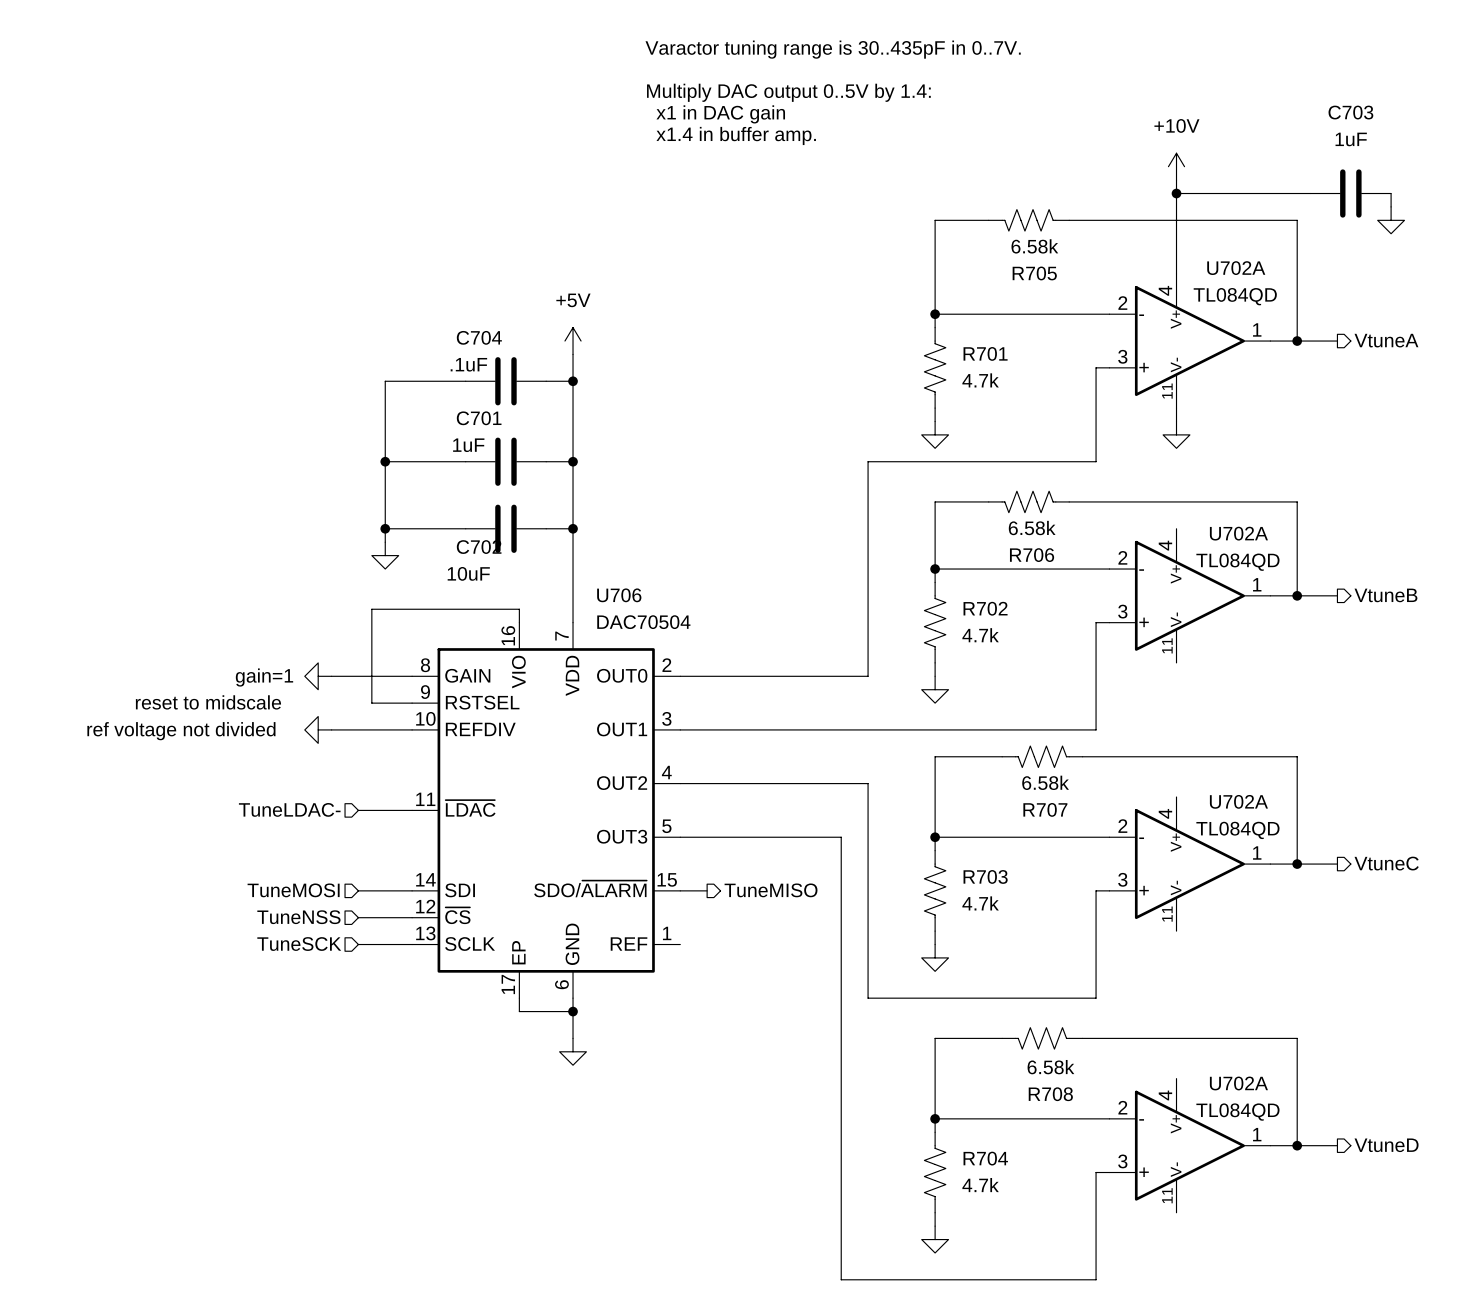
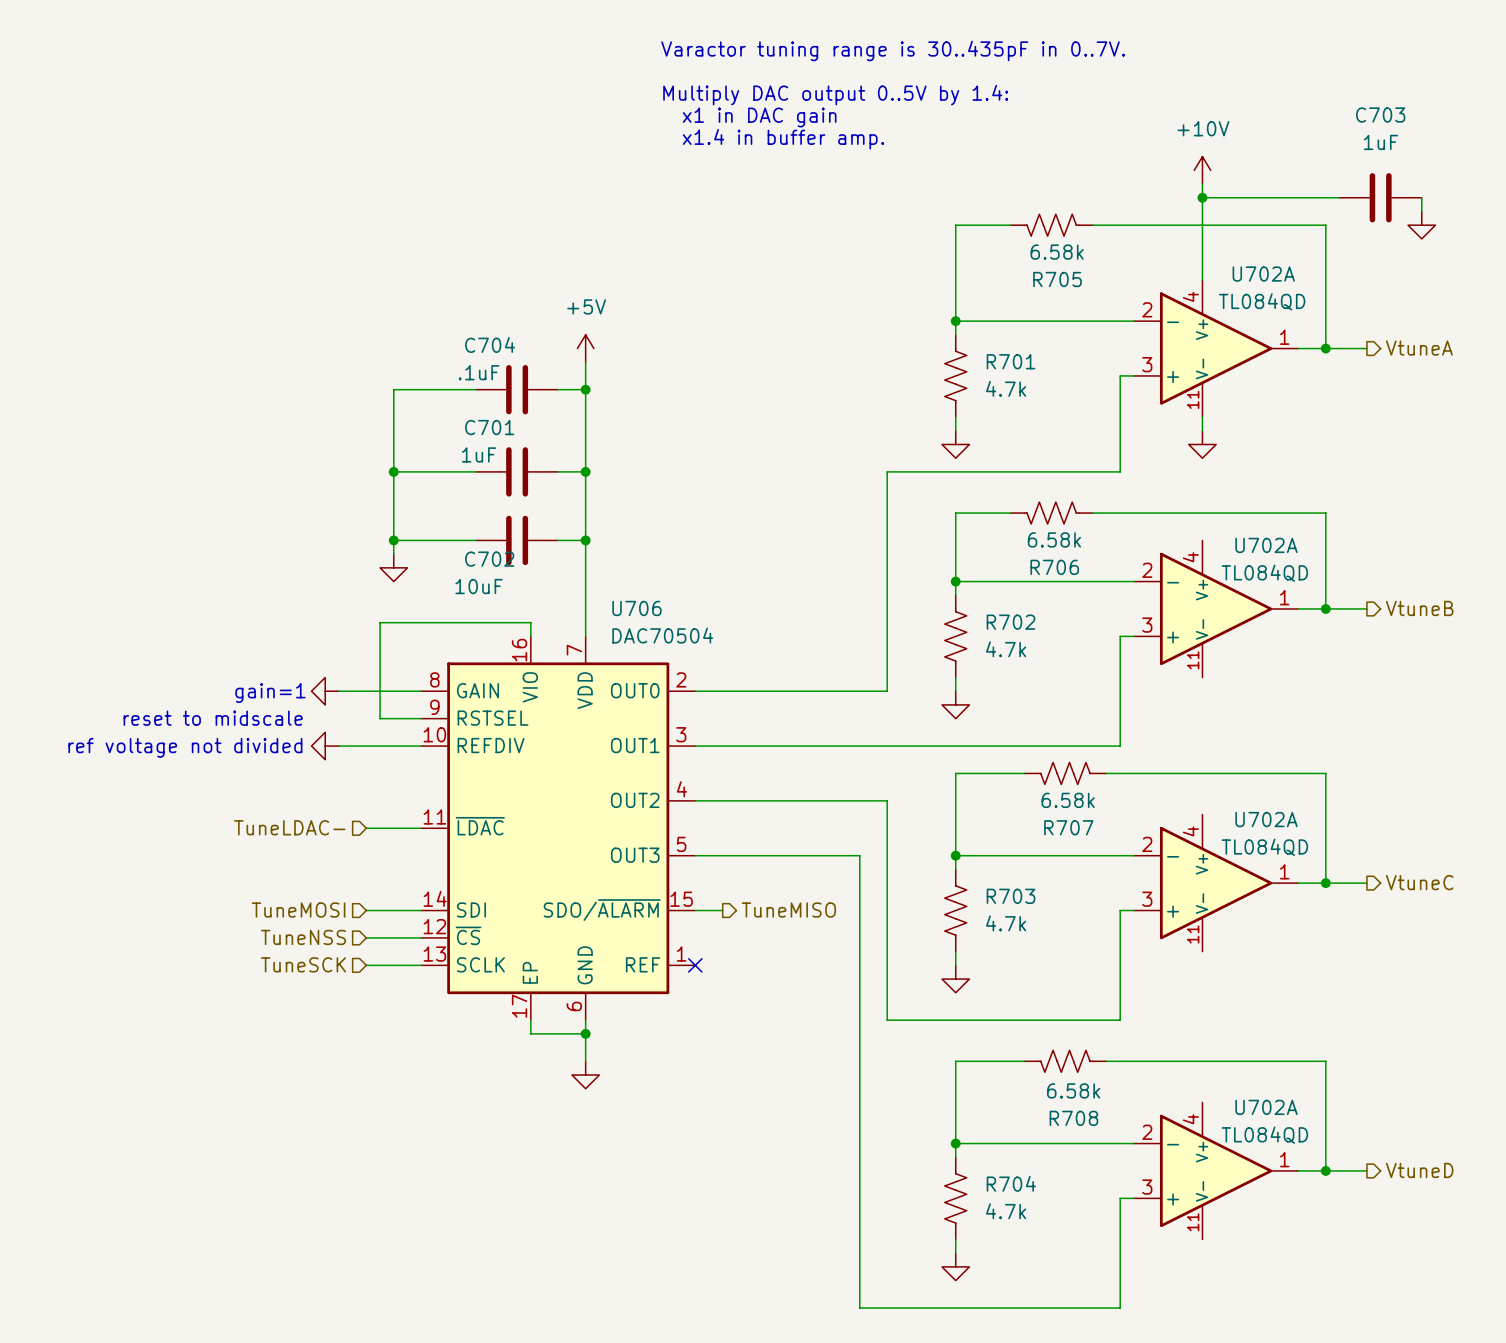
no-connect mark: none -> (695, 965)

